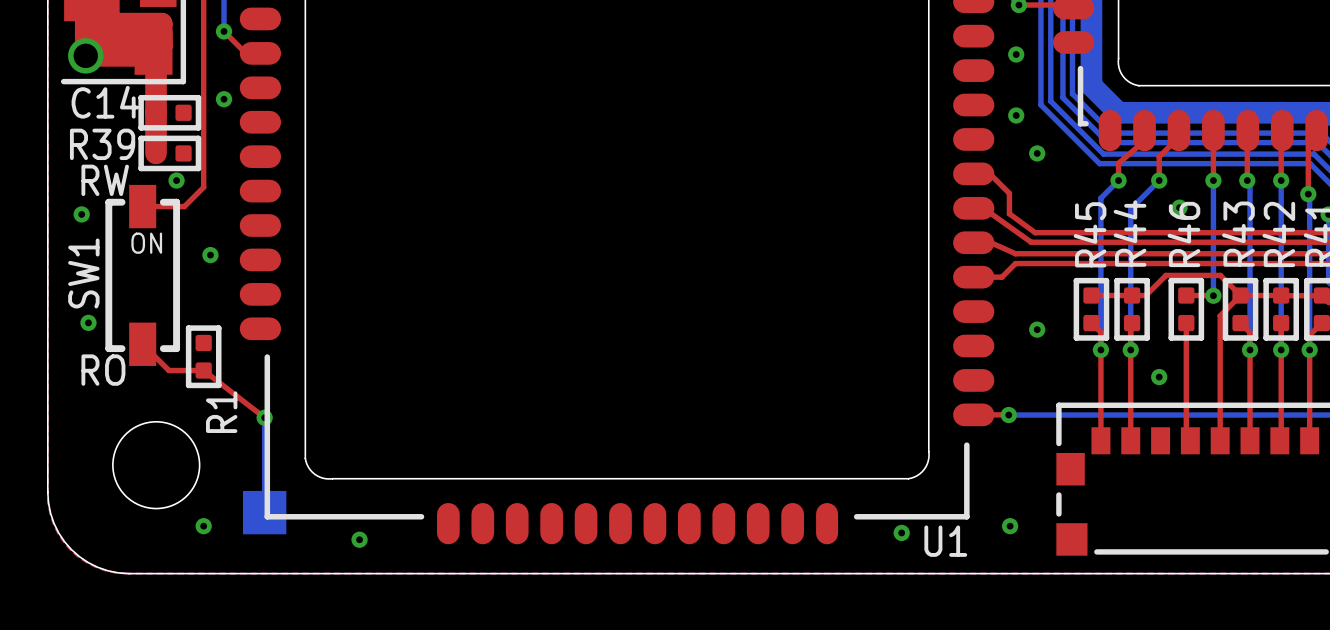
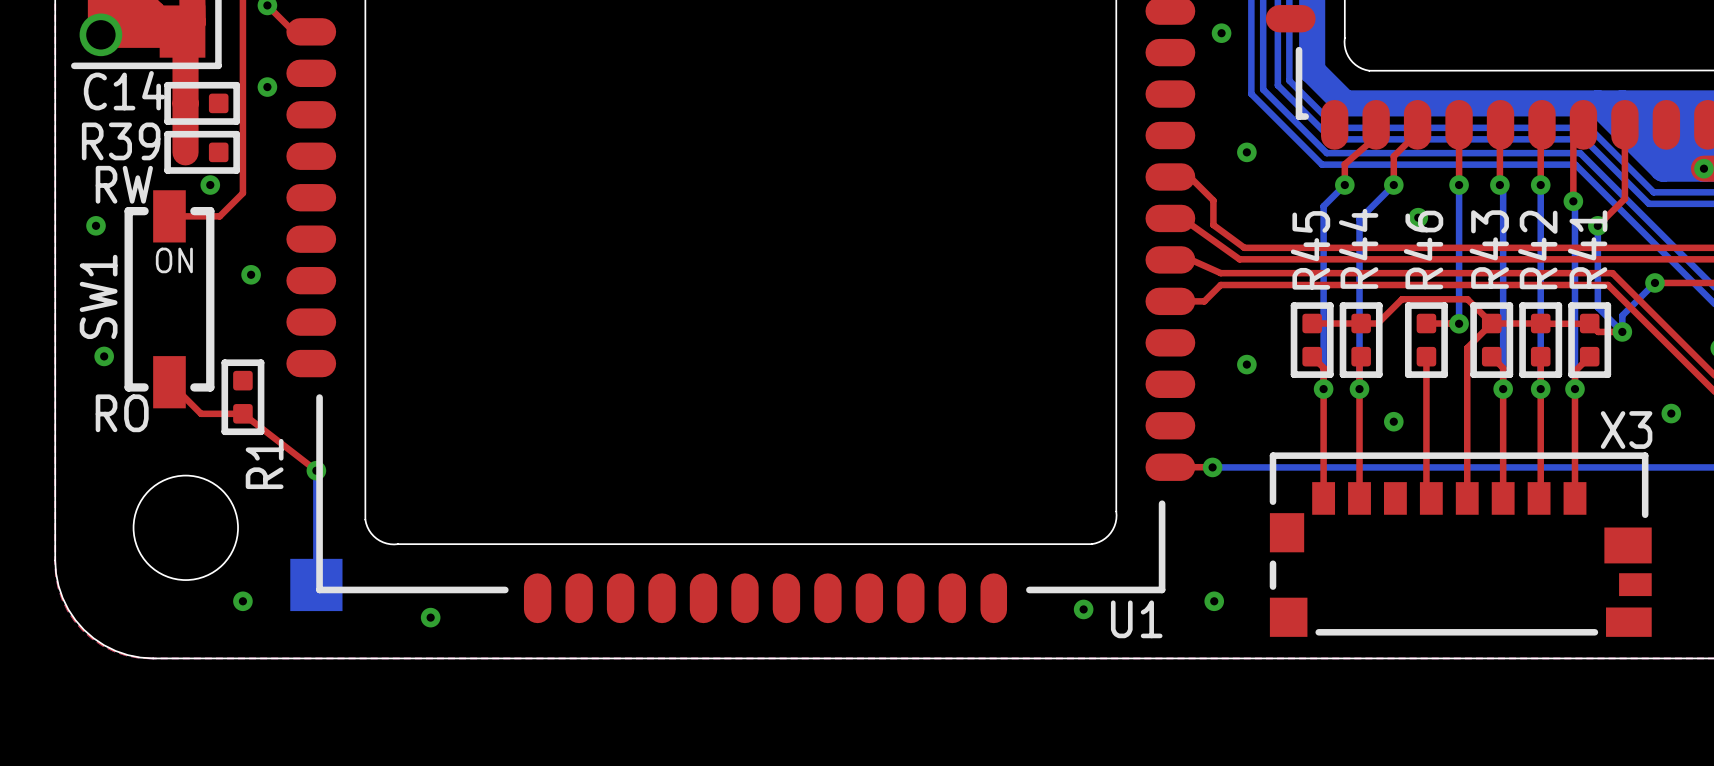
via: (1016, 115) -> none

